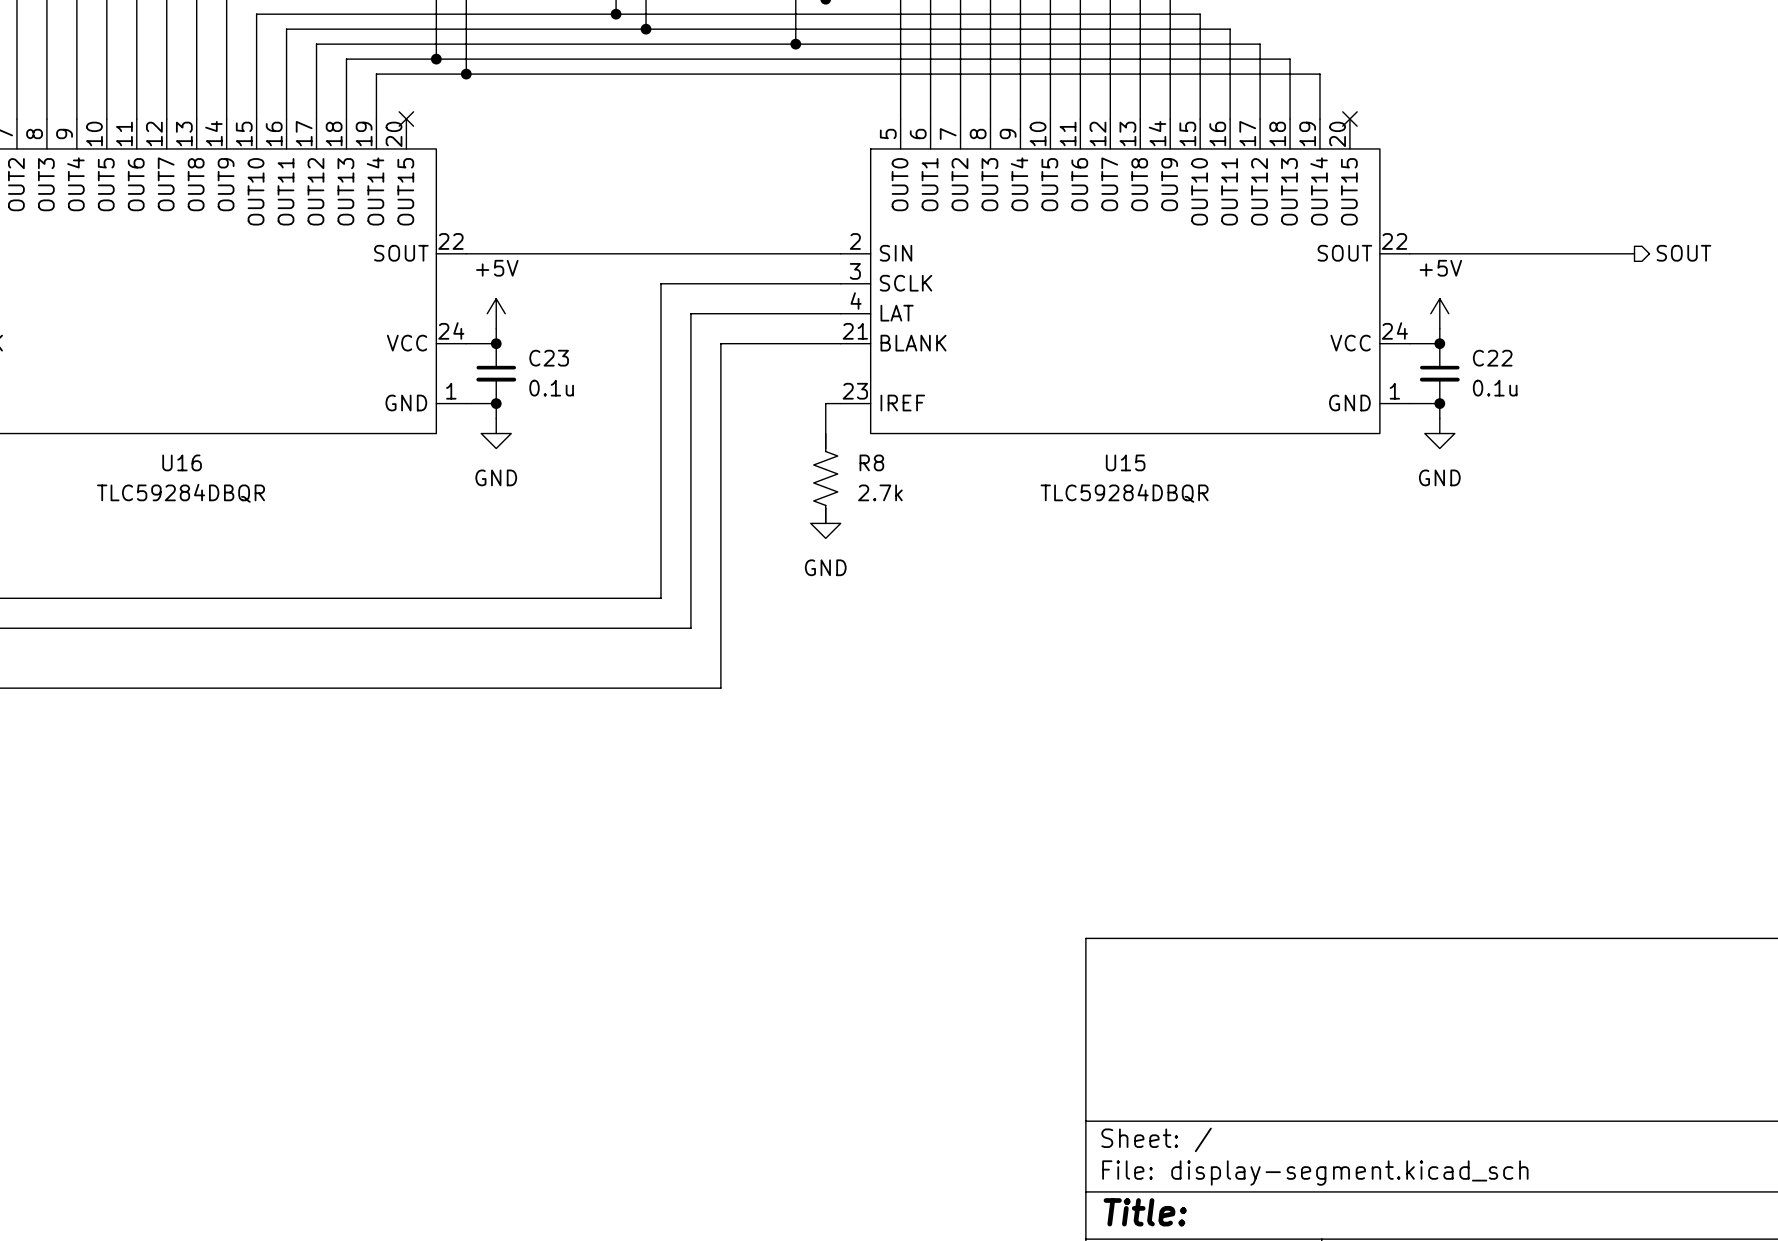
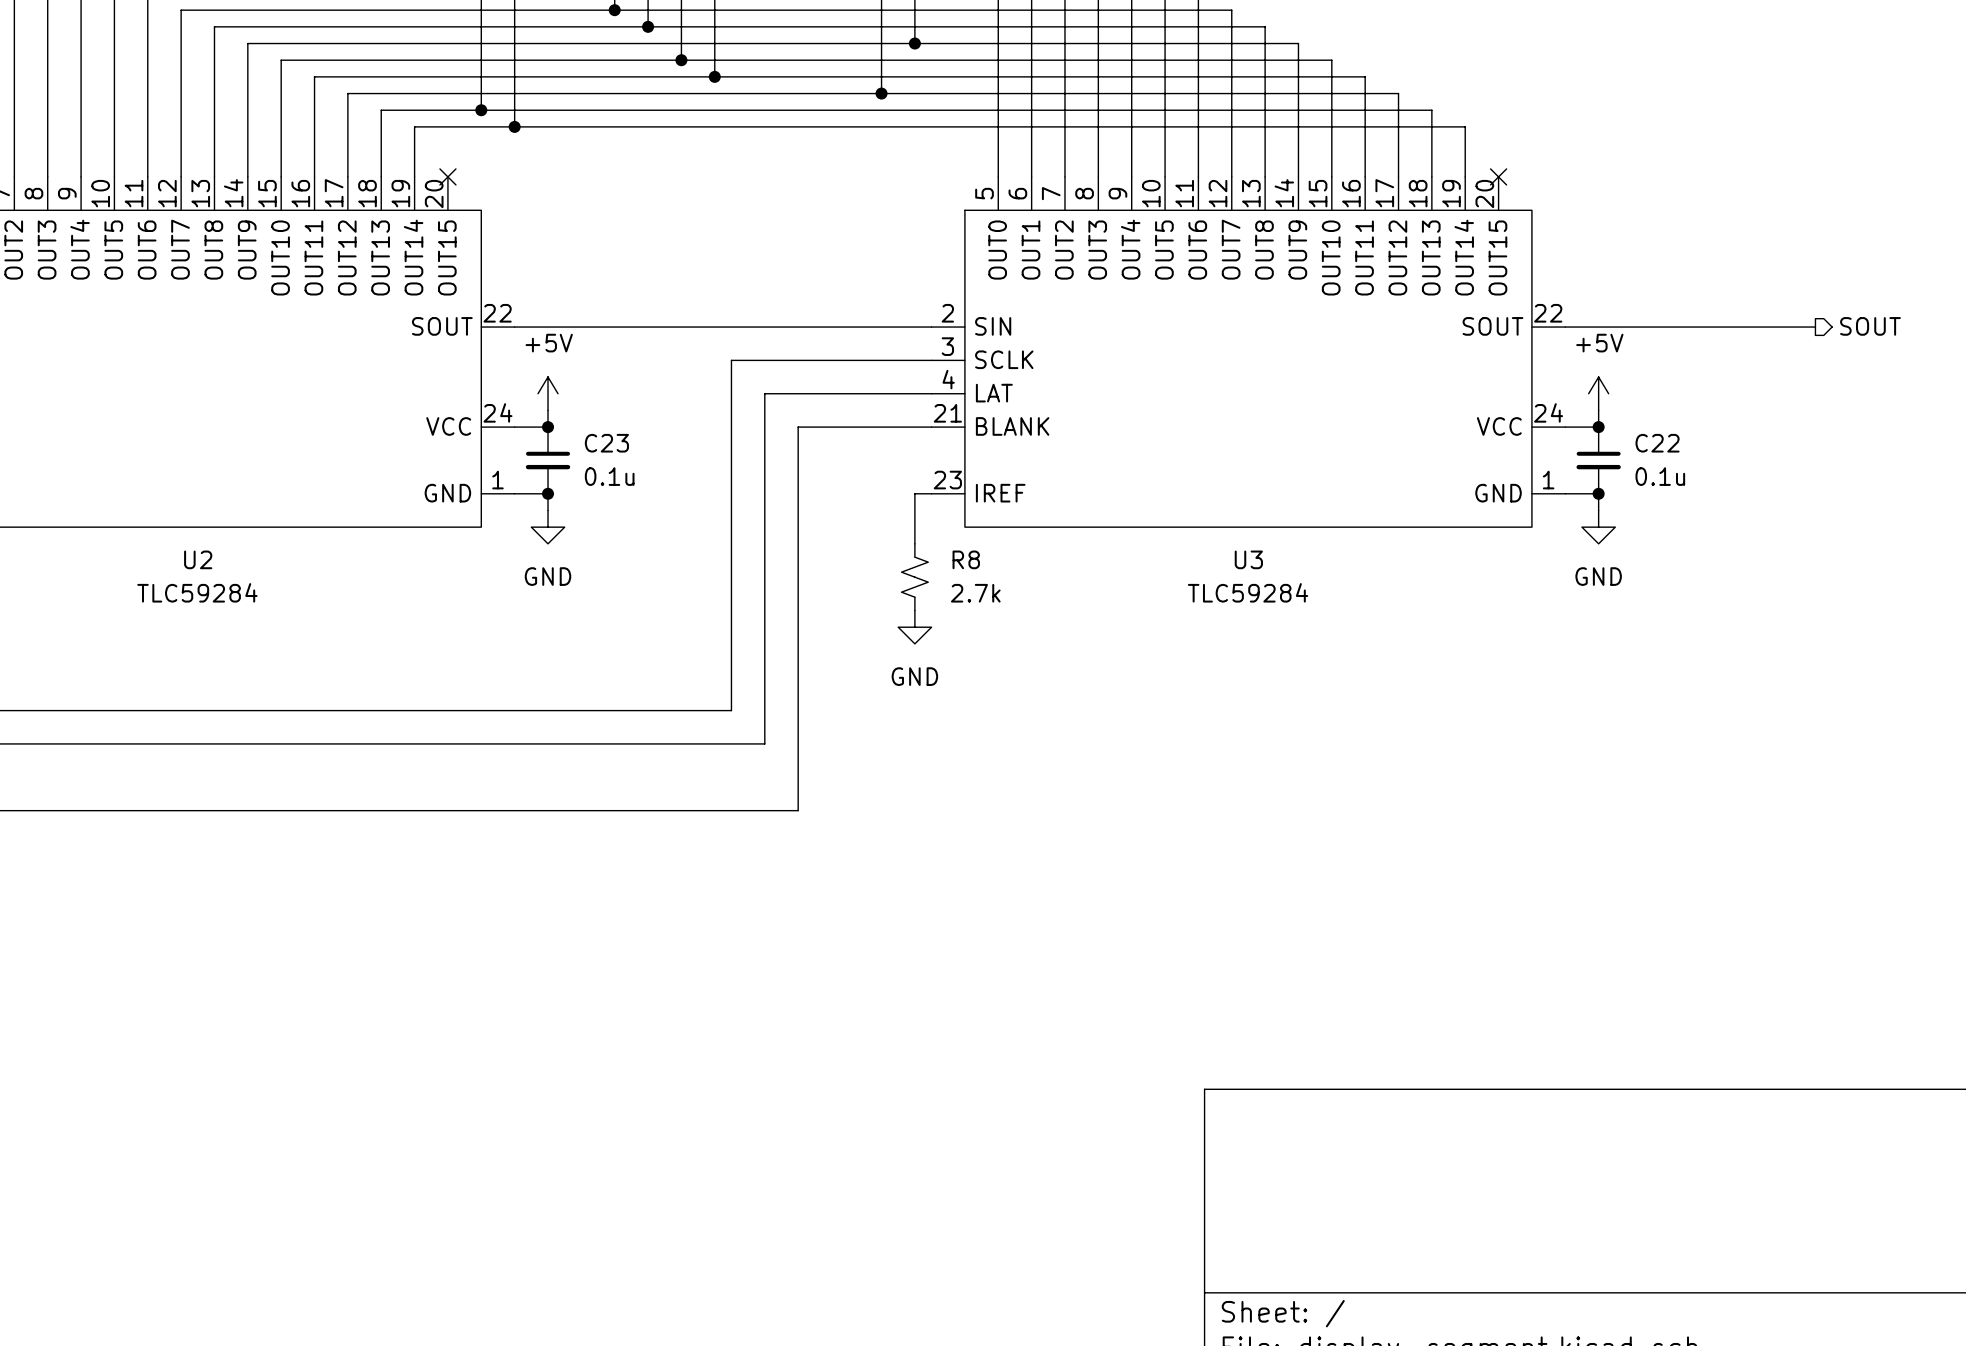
R8 symbol: [813, 433, 838, 524] -> [901, 543, 929, 611]
U16 name: U16 (182, 462) -> U2 (198, 559)
U15 name: U15 (1125, 462) -> U3 (1248, 559)
U16 value: TLC59284DBQR (181, 493) -> TLC59284 (197, 592)
U15 value: TLC59284DBQR (1124, 493) -> TLC59284 (1248, 592)

